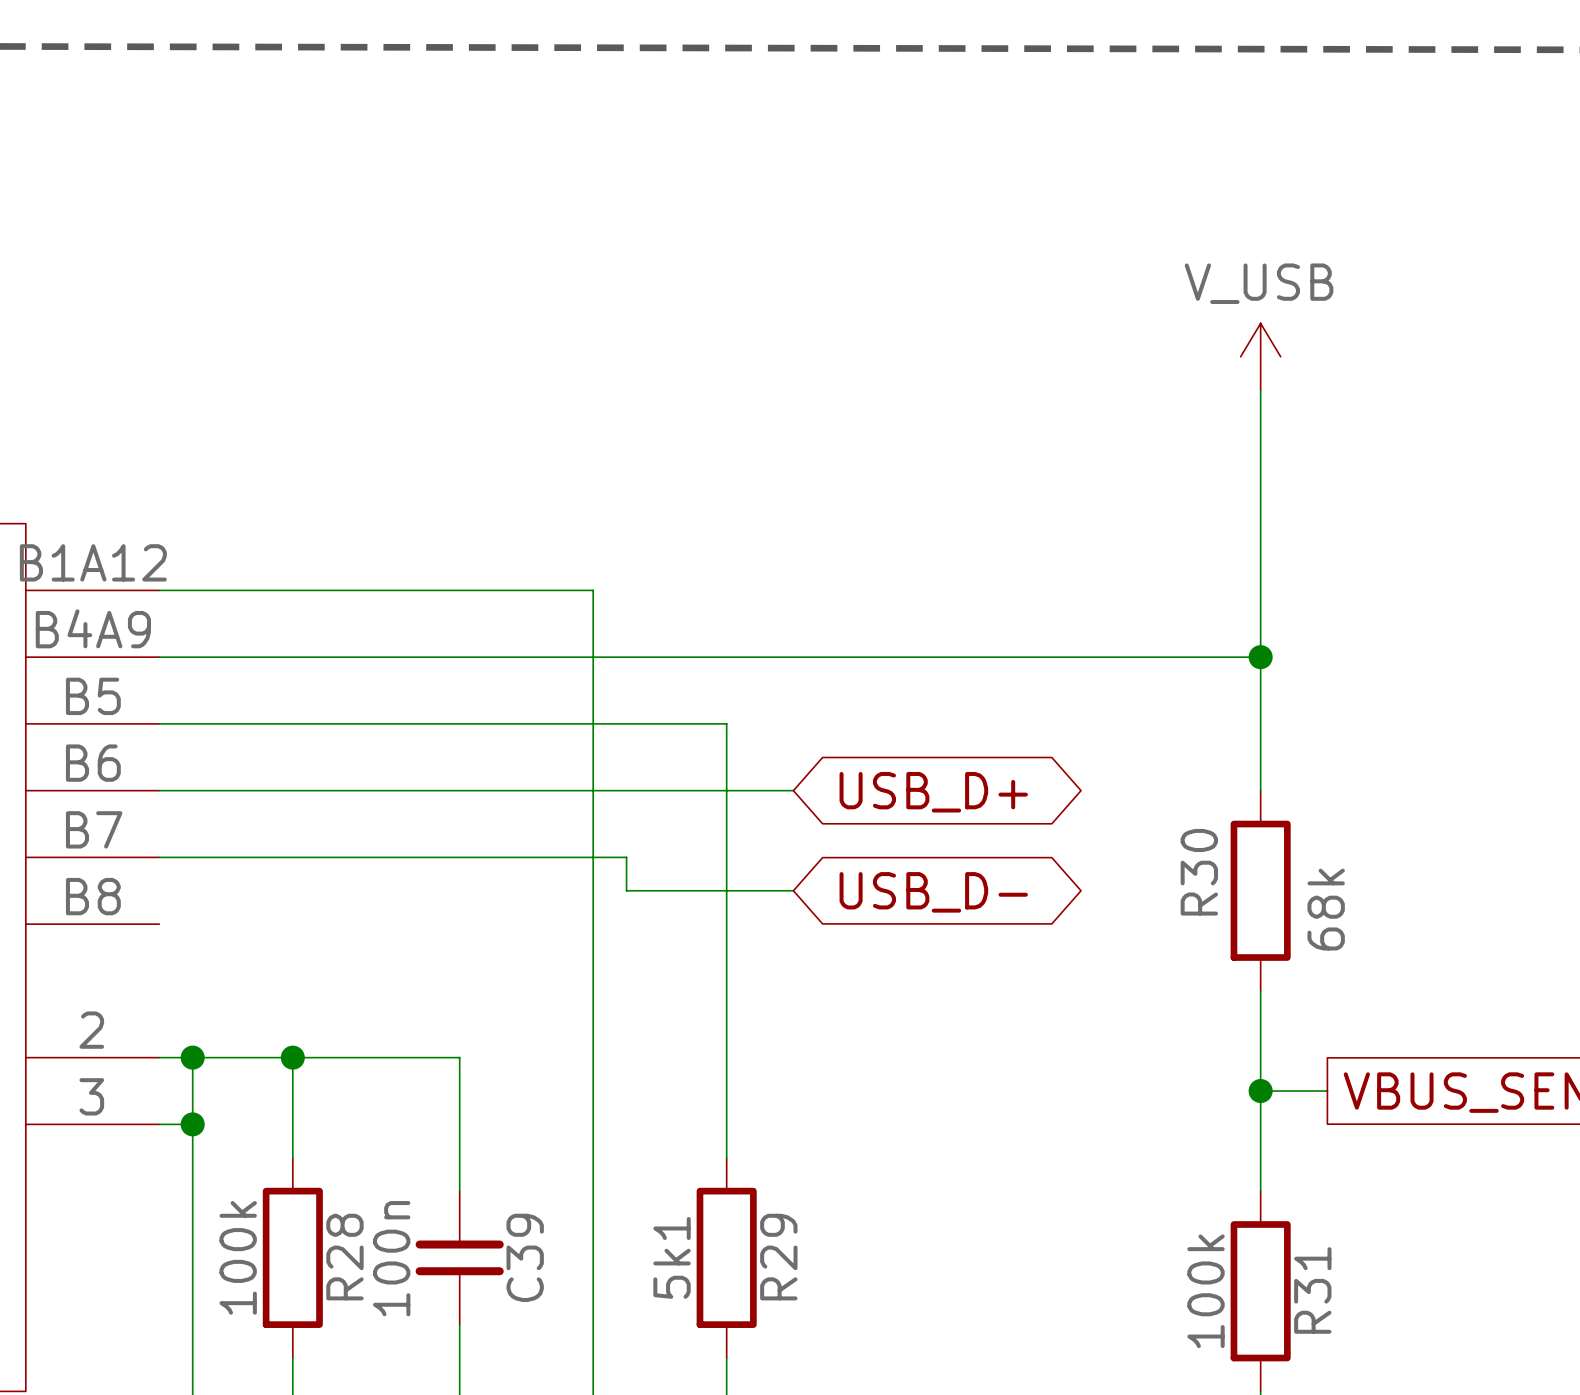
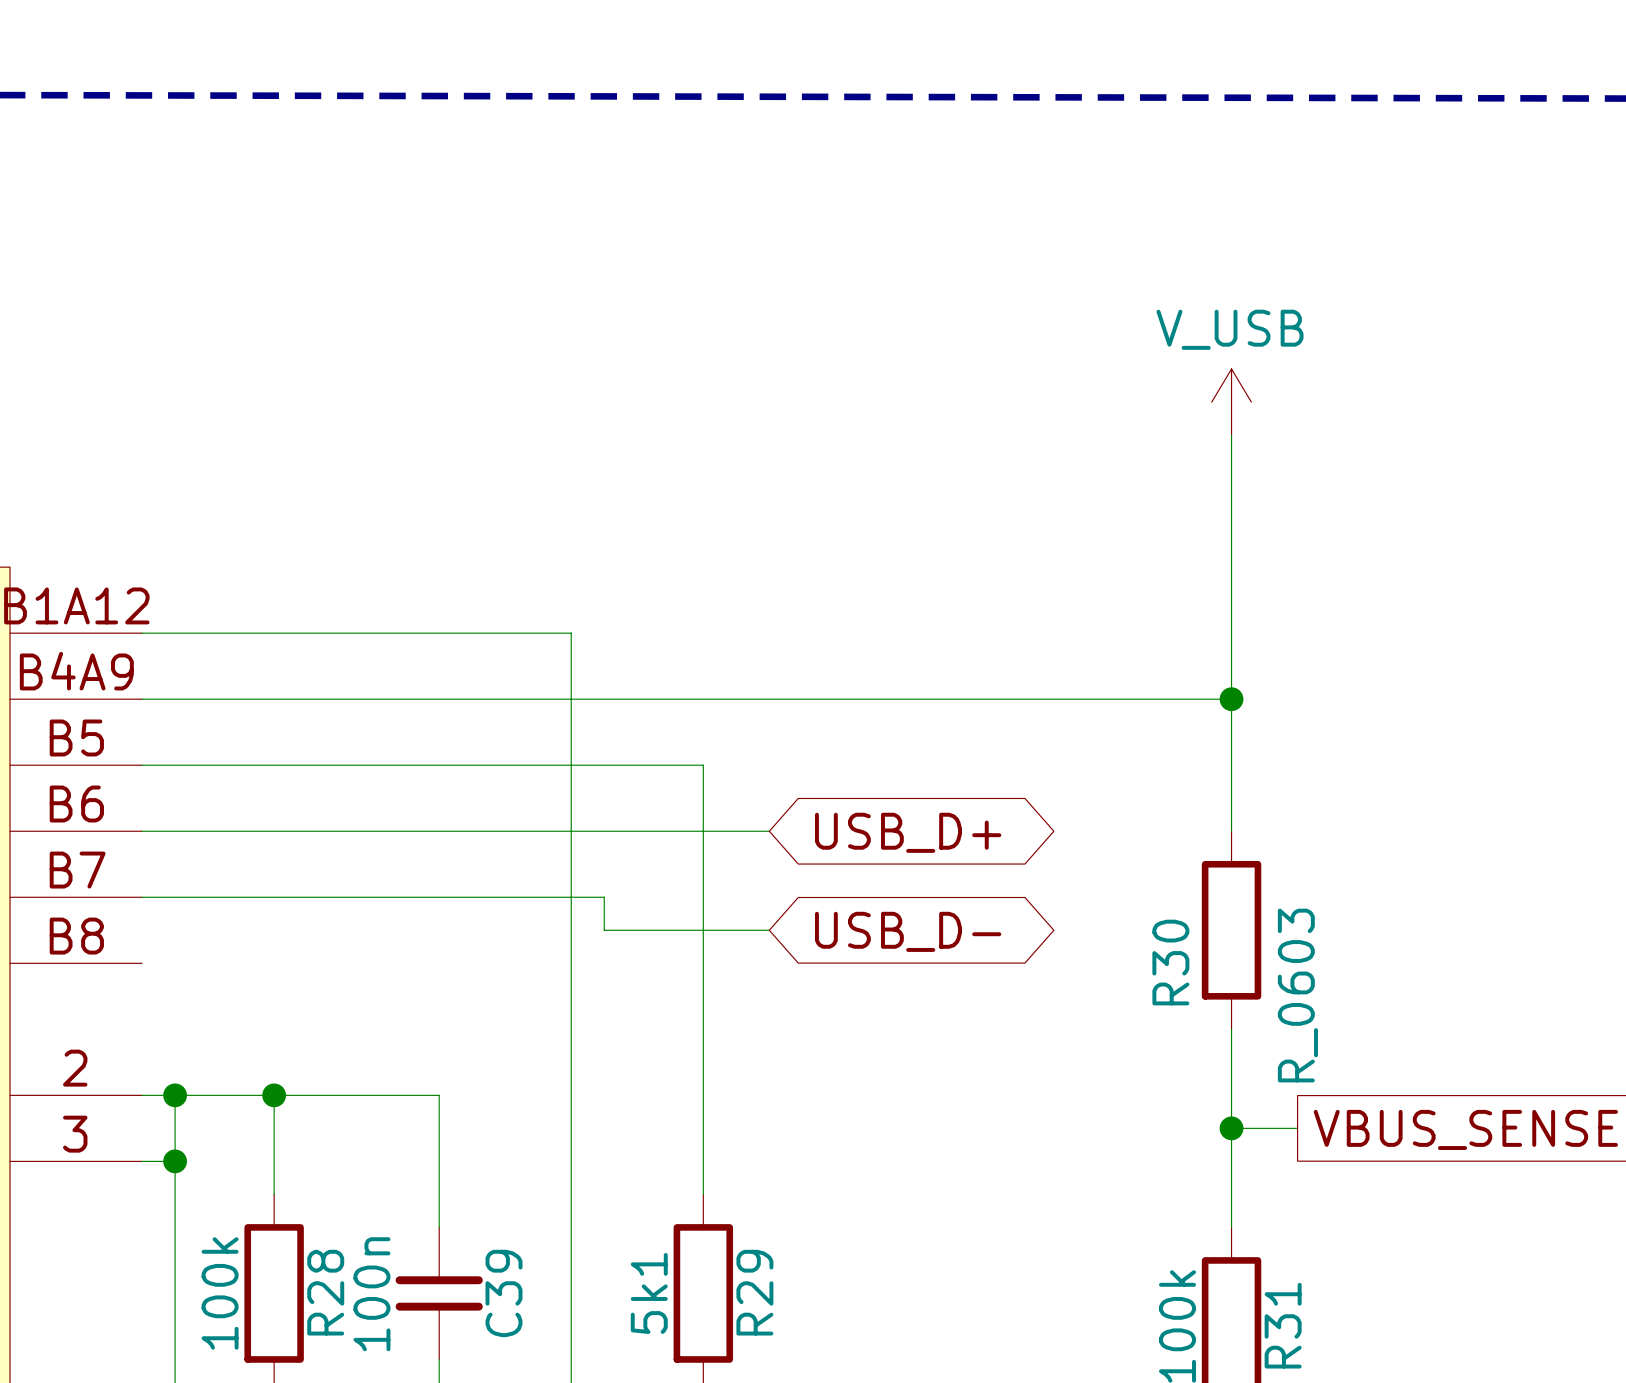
R30 name position: R30 (1199, 872) -> R30 (1170, 962)
R30 value: 68k (1326, 909) -> R_0603 (1297, 995)

